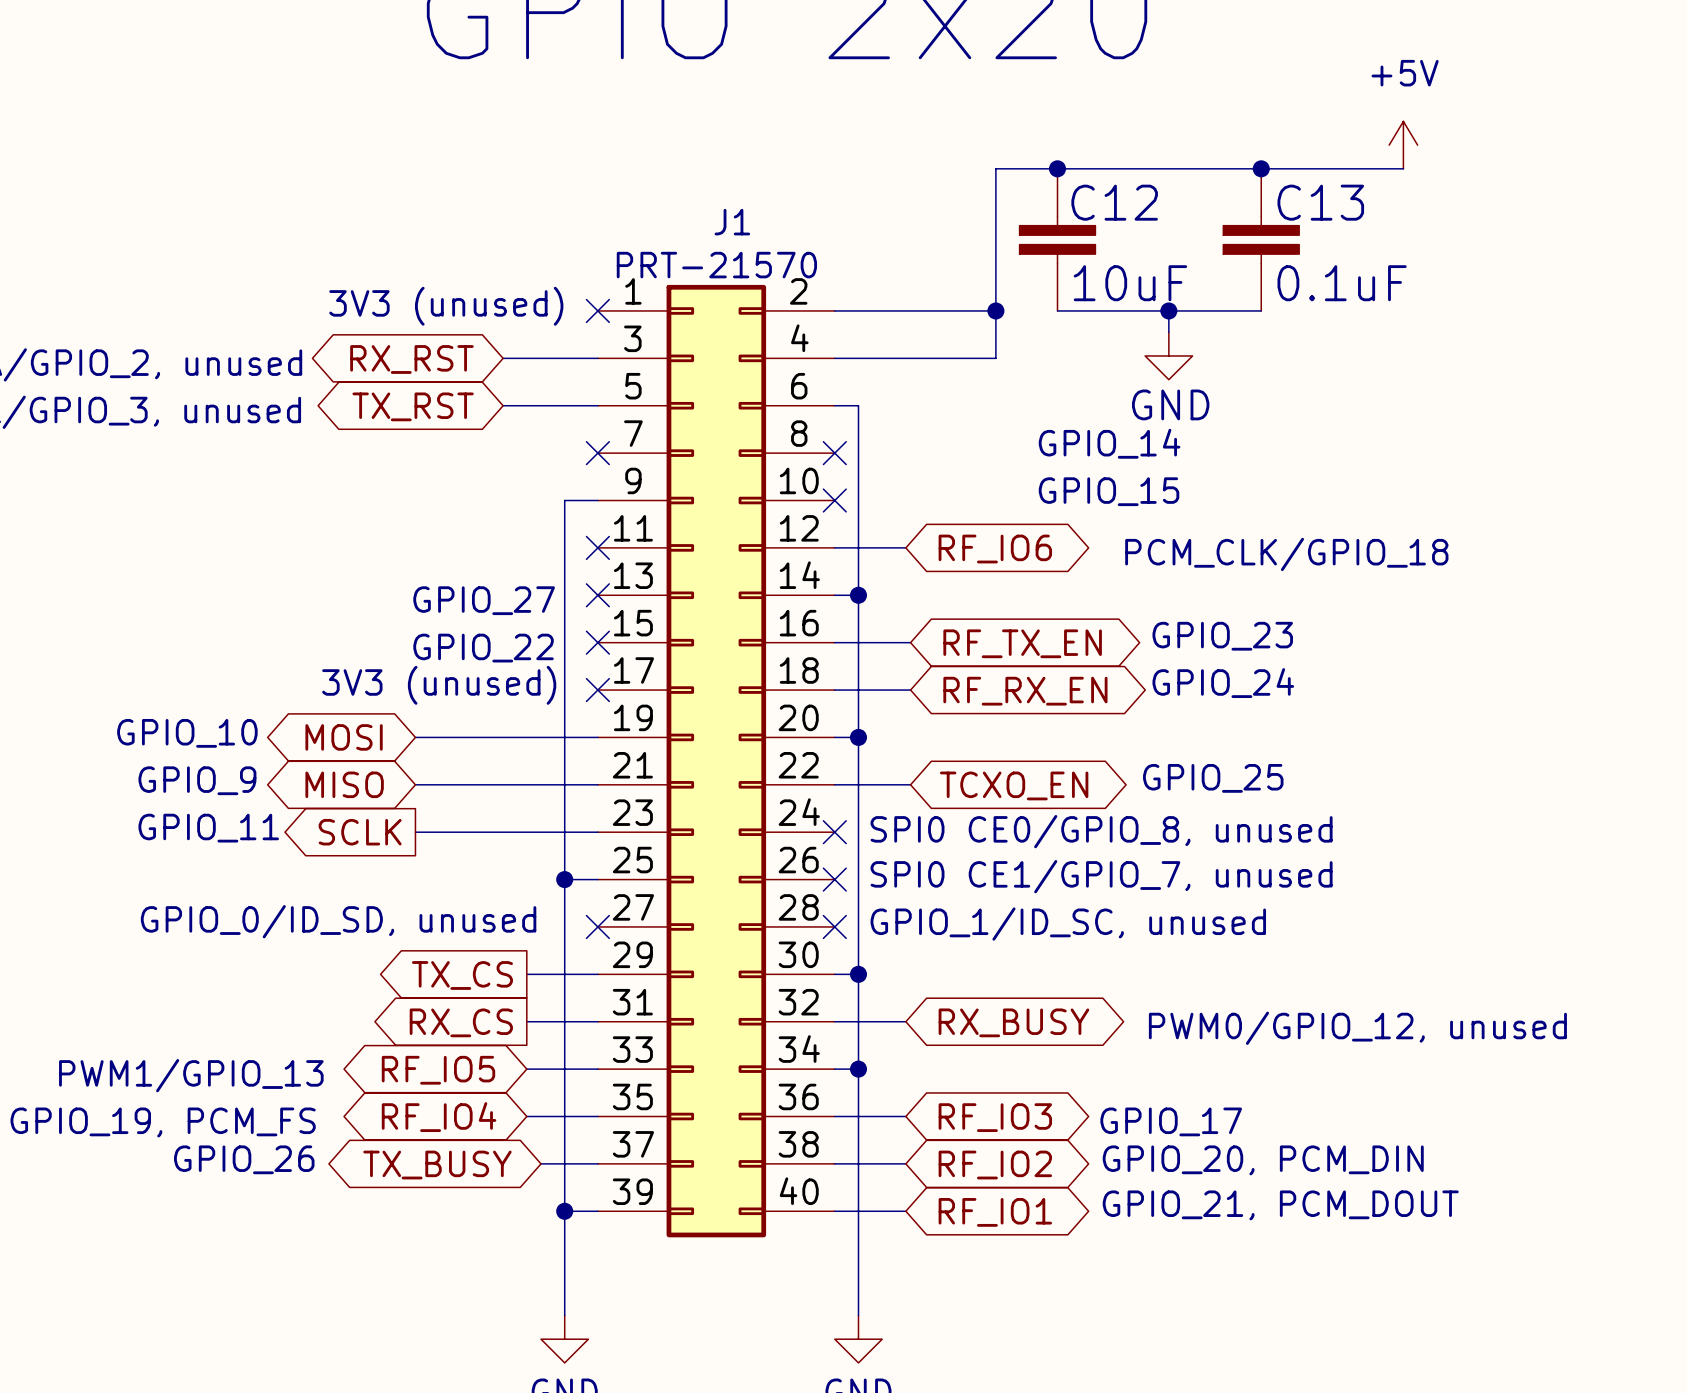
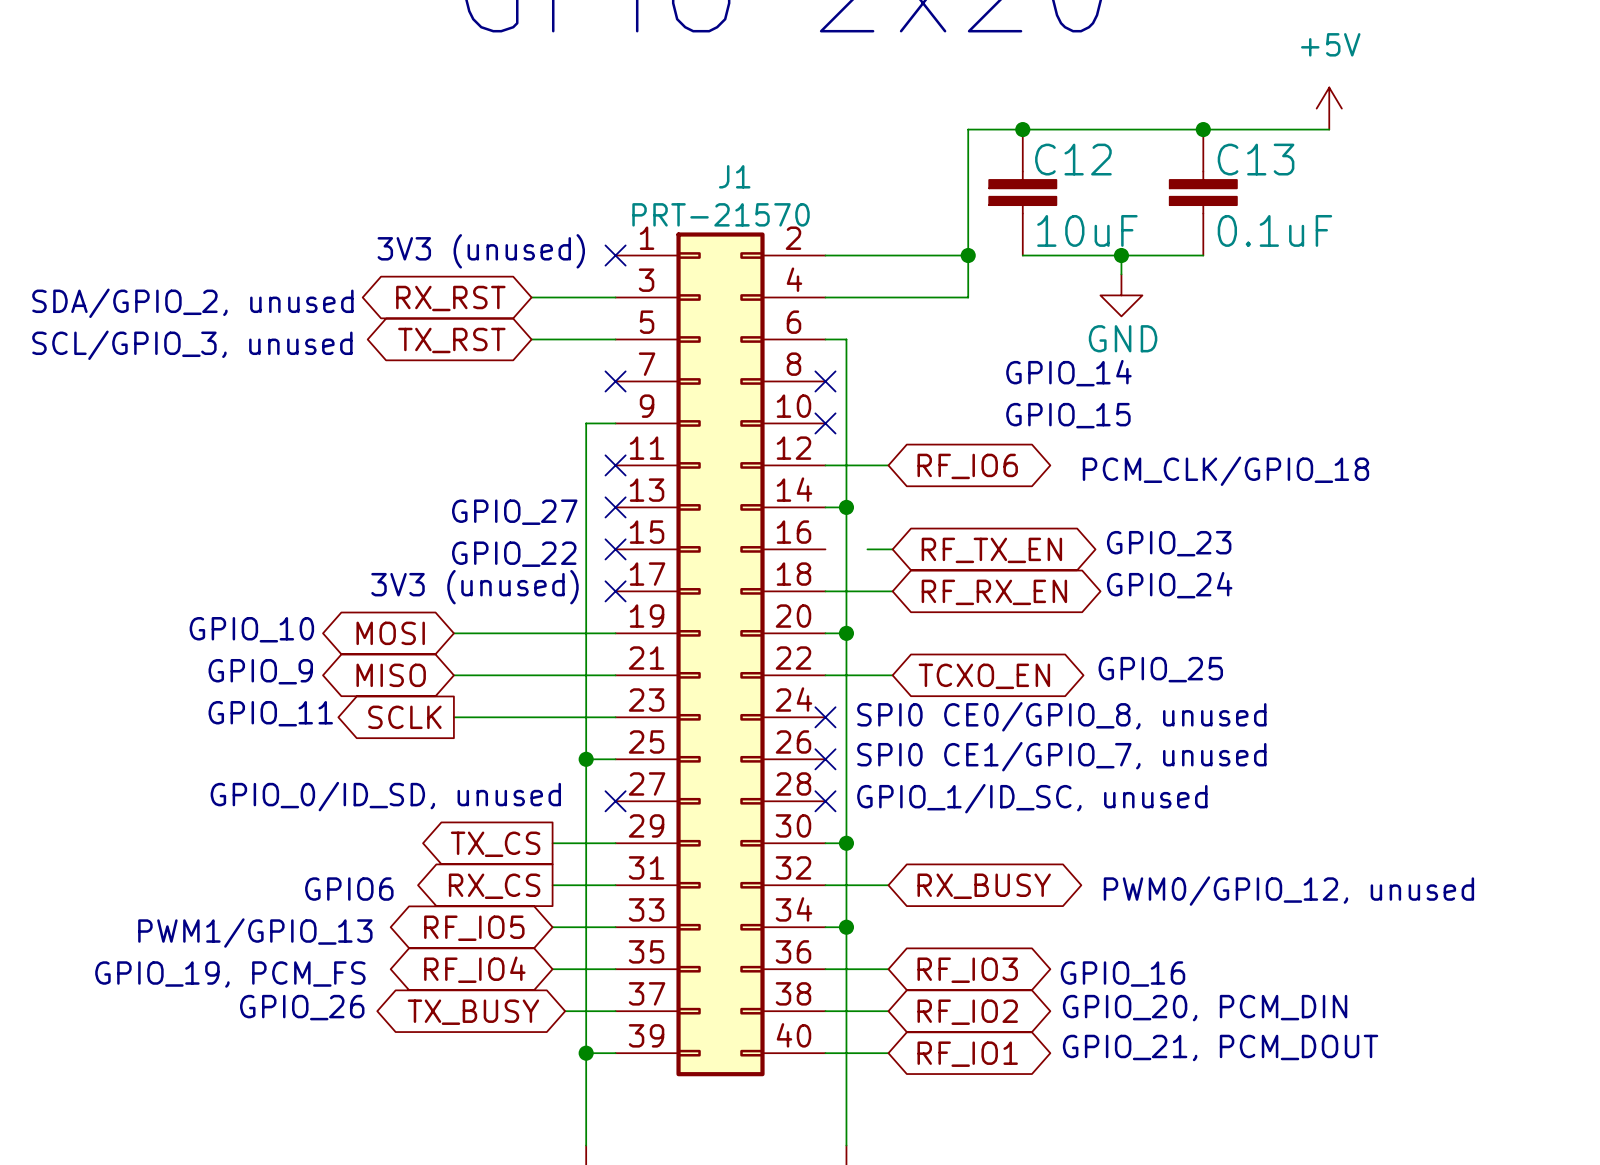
wire: (834, 642) (882, 642) -> none
text: none -> GPIO6 (349, 889)
text: GPIO_17 (1171, 1121) -> GPIO_16 (1123, 974)

